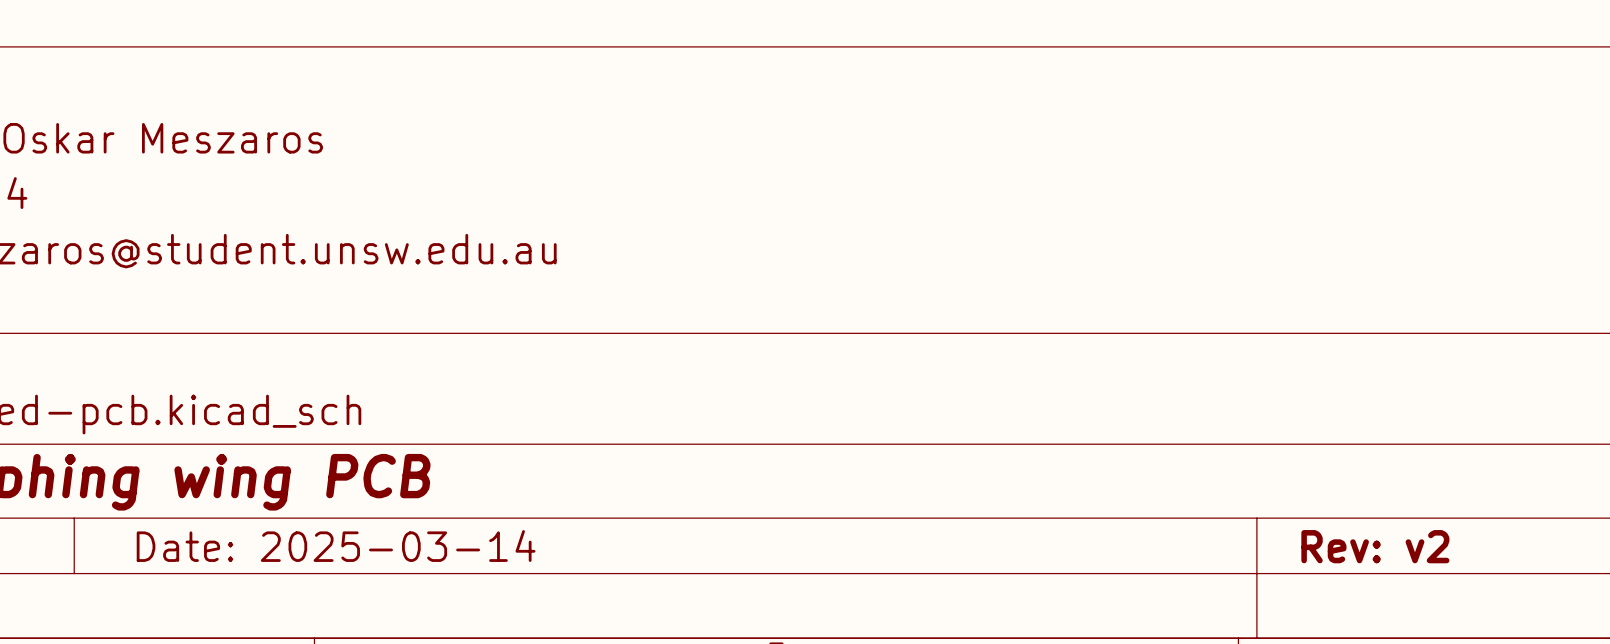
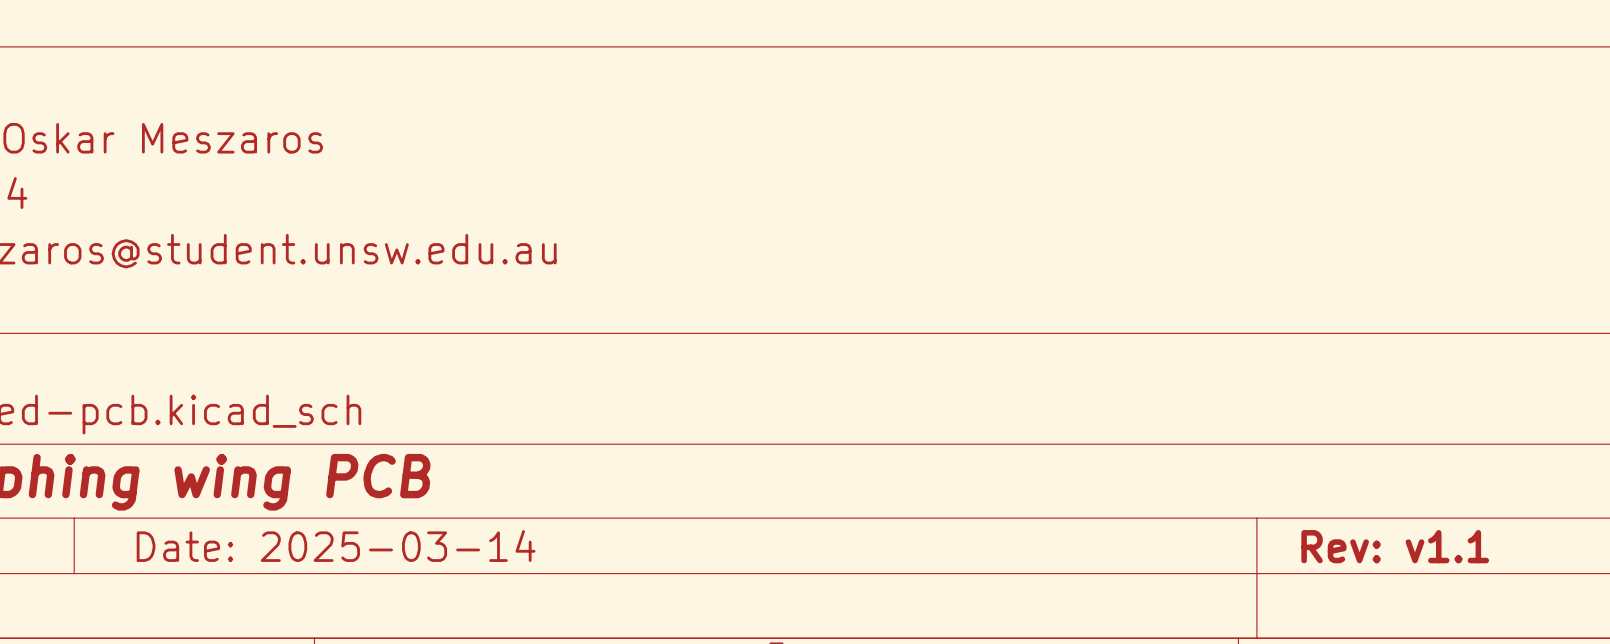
title block: Rev: v2 (1375, 546) -> Rev: v1.1 (1395, 546)

